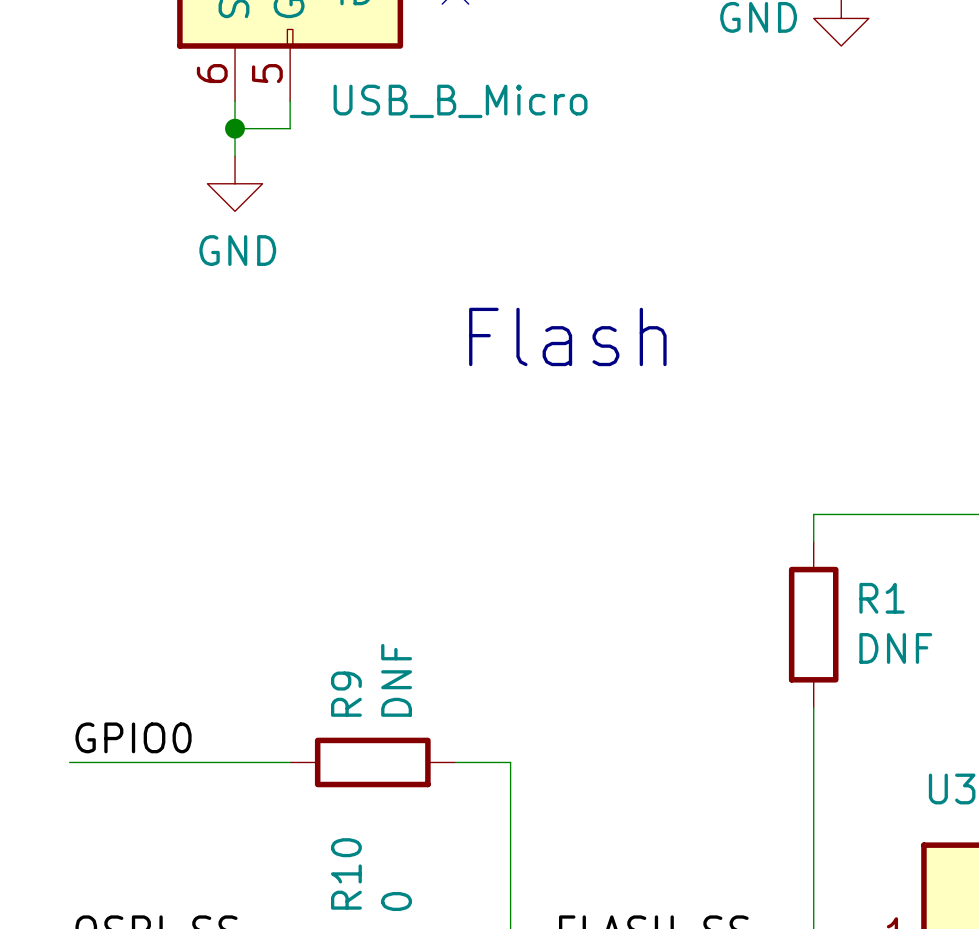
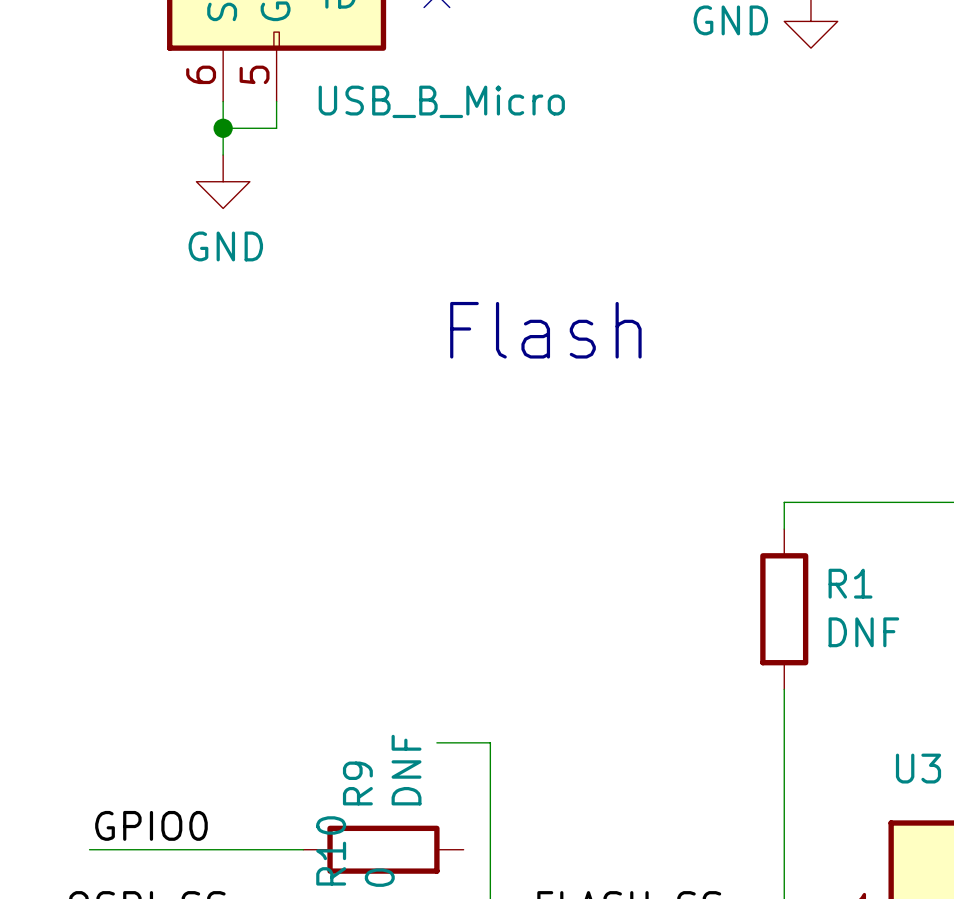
label position: GPIO0 (133, 737) -> GPIO0 (151, 825)
wire: (69, 762) (290, 762) -> (89, 849) (303, 849)
R9 position: (372, 762) -> (383, 849)

